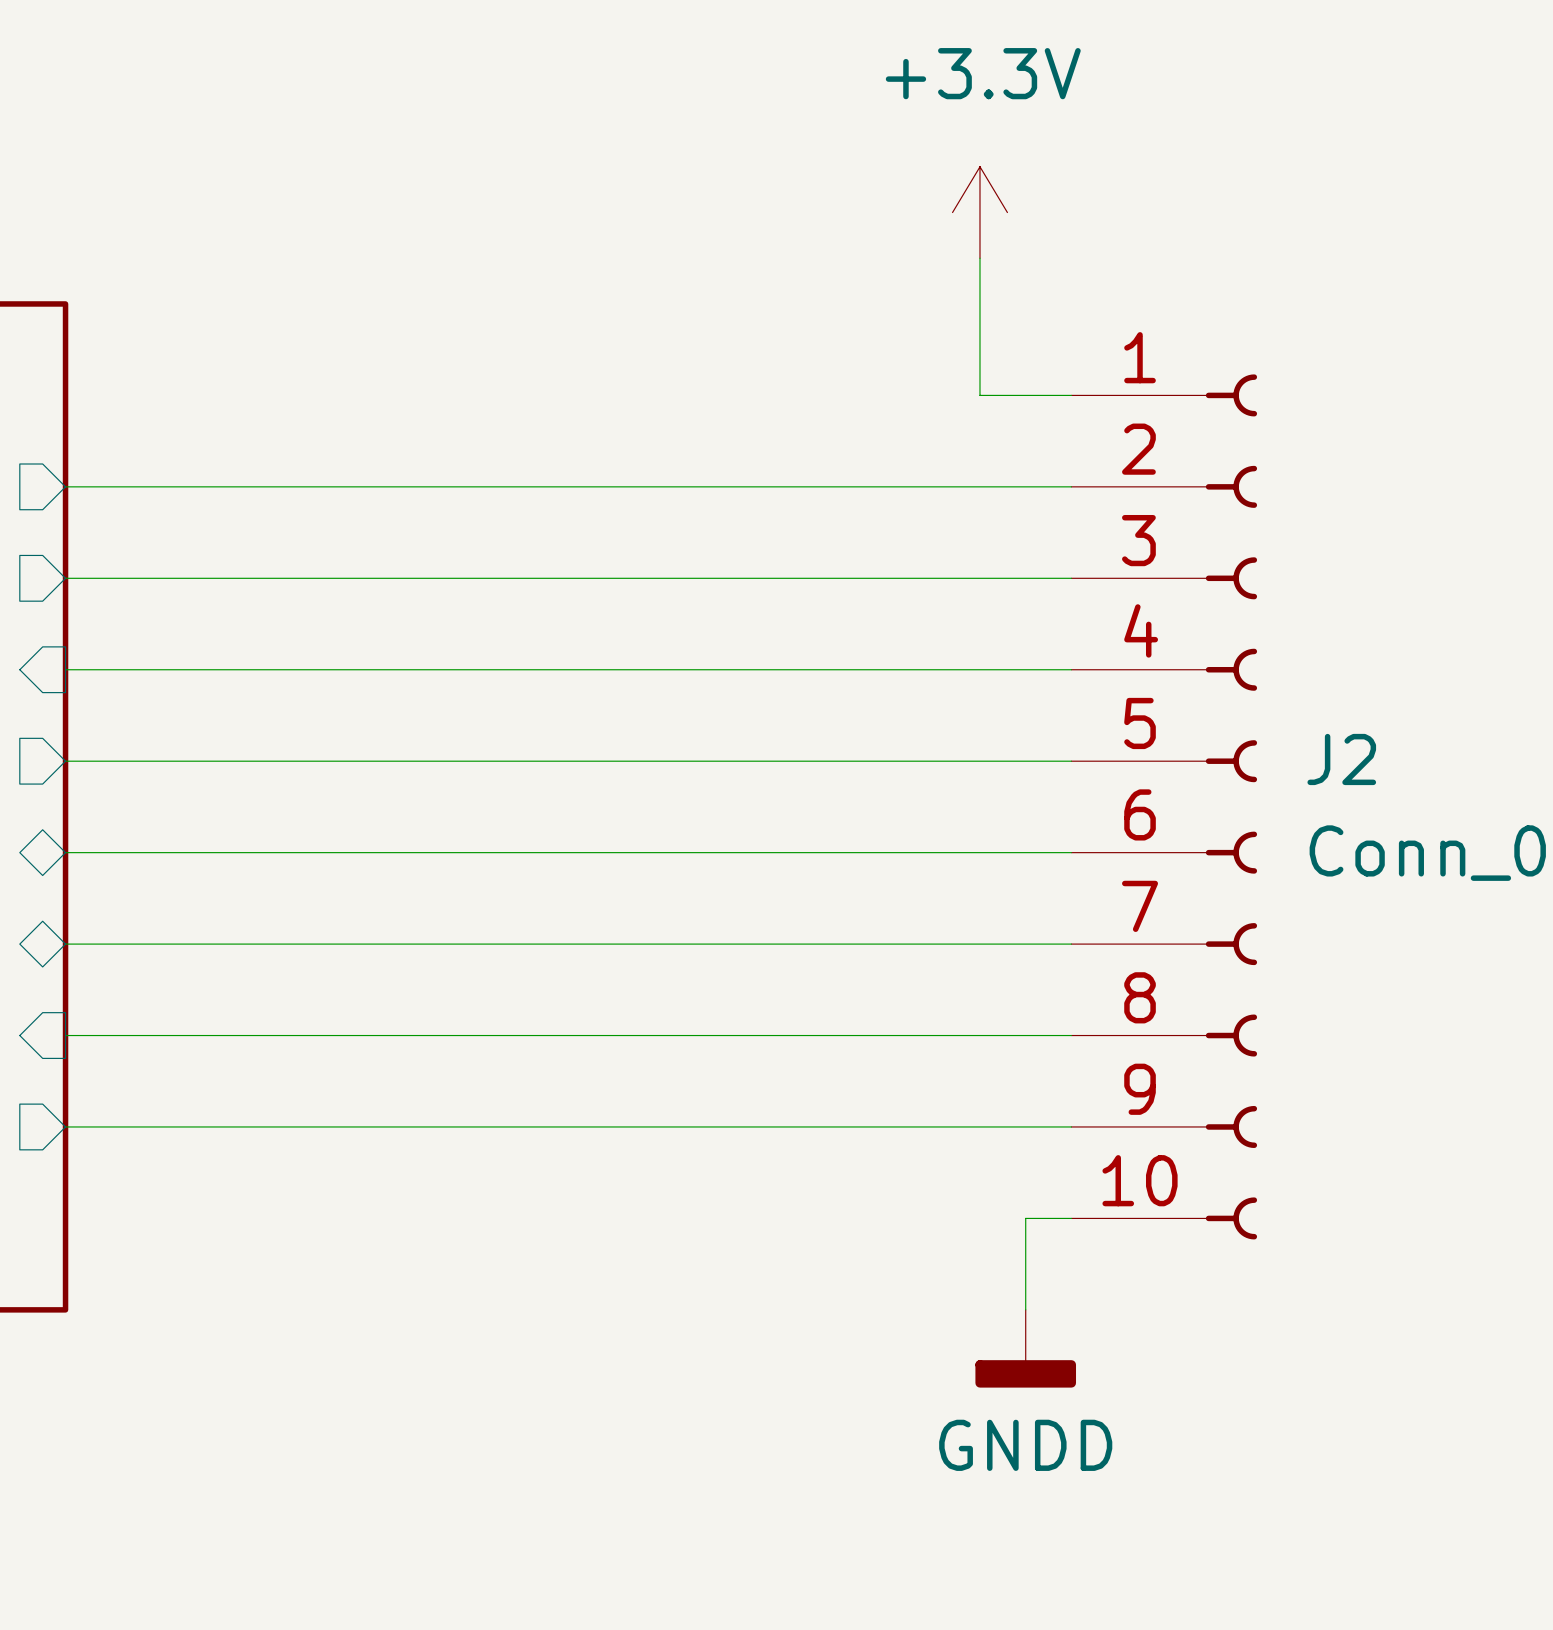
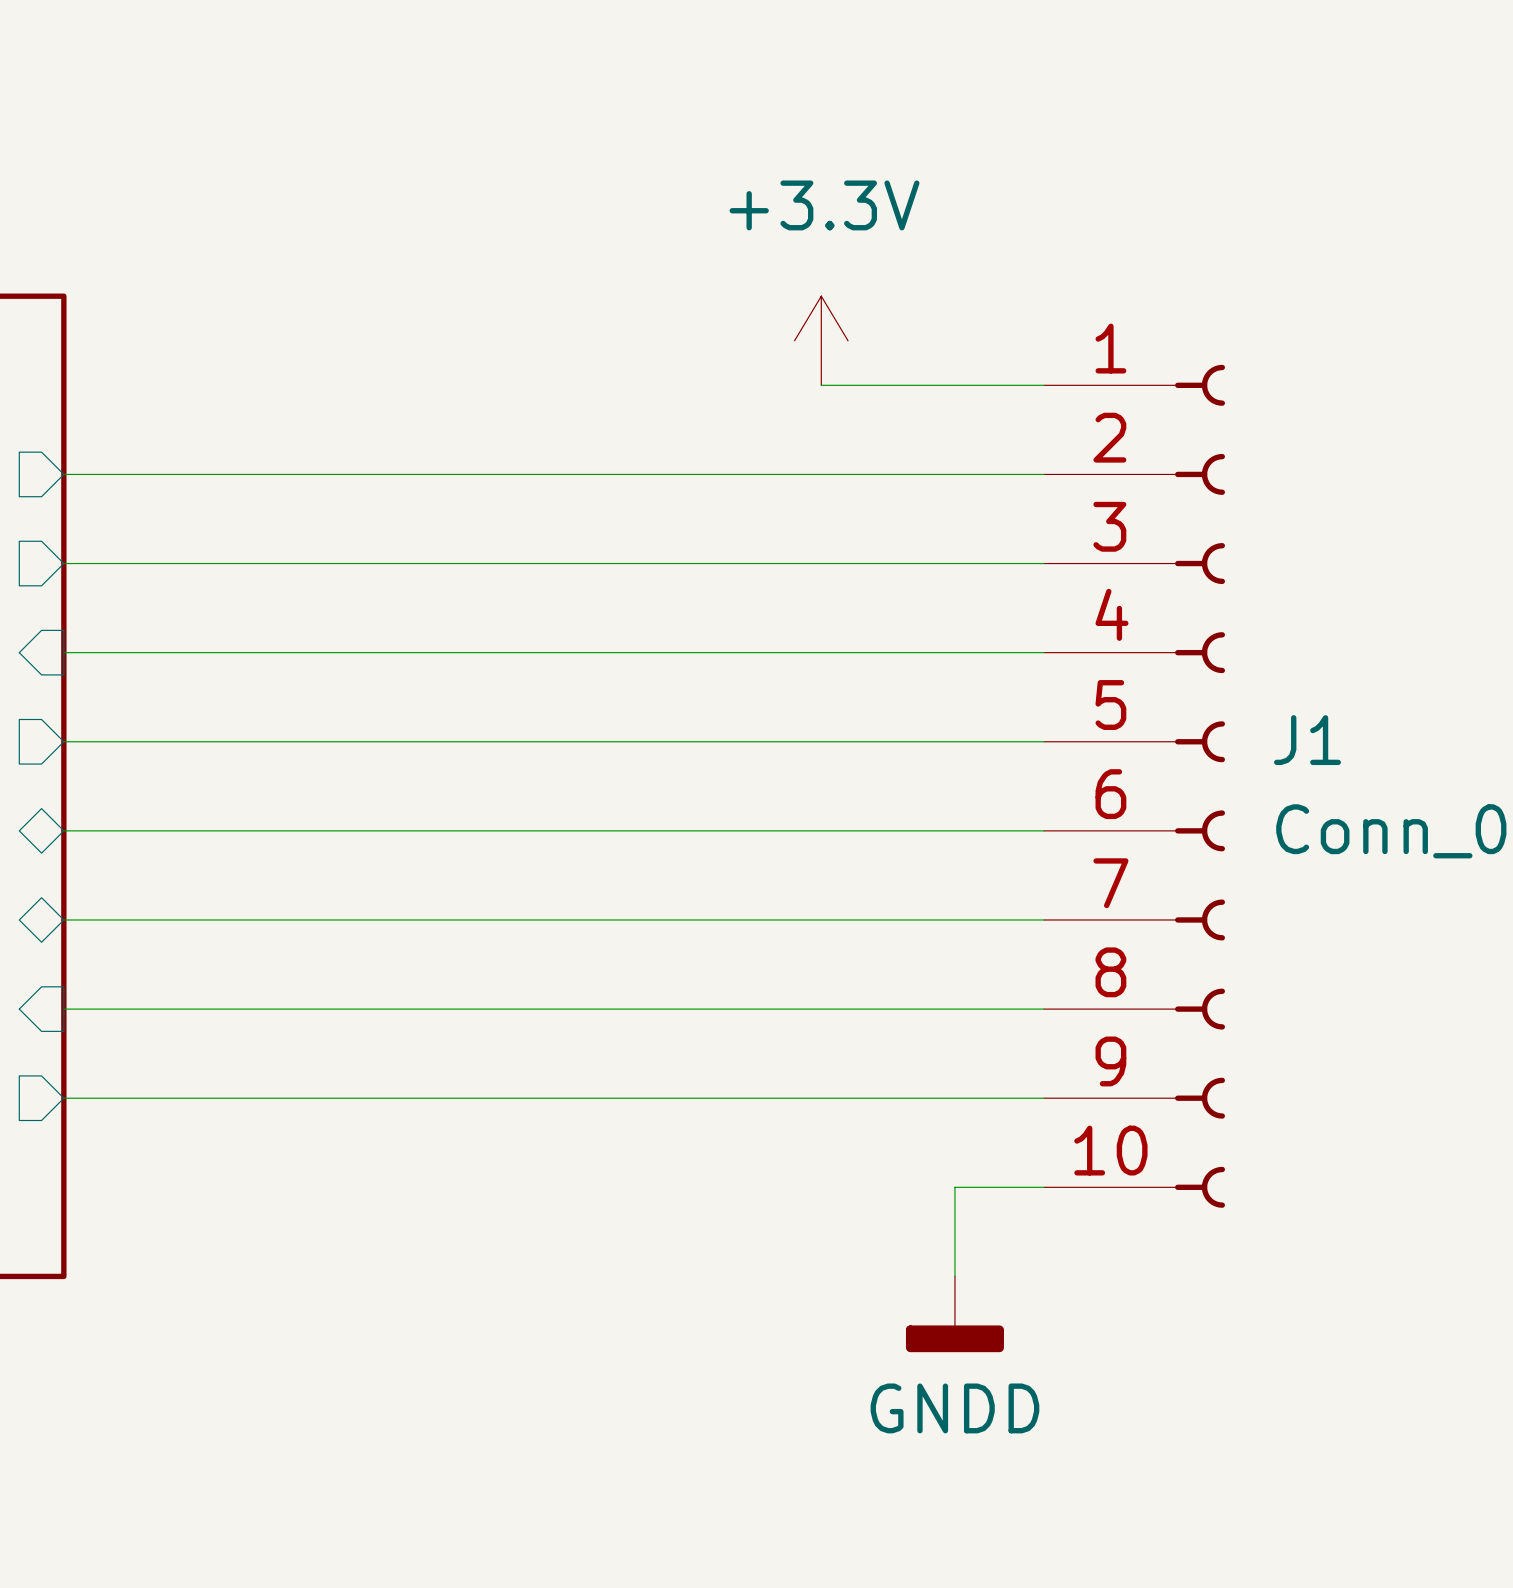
power symbol position: +3.3V (979, 212) -> +3.3V (821, 340)
wire: (979, 258) (979, 395) -> (821, 385) (954, 385)
J2 name: J2 (1341, 759) -> J1 (1307, 740)
wire: (1025, 1218) (1025, 1309) -> (999, 1187) (954, 1187) (954, 1276)
power symbol position: GNDD (1025, 1348) -> GNDD (954, 1314)

